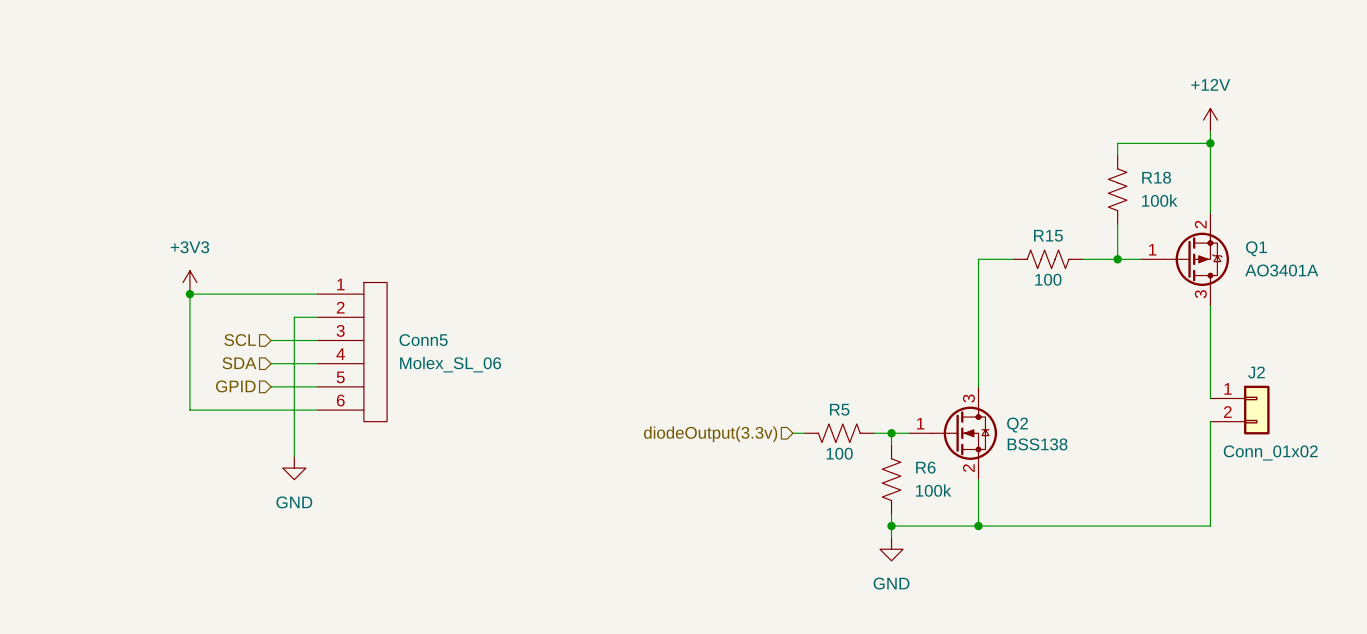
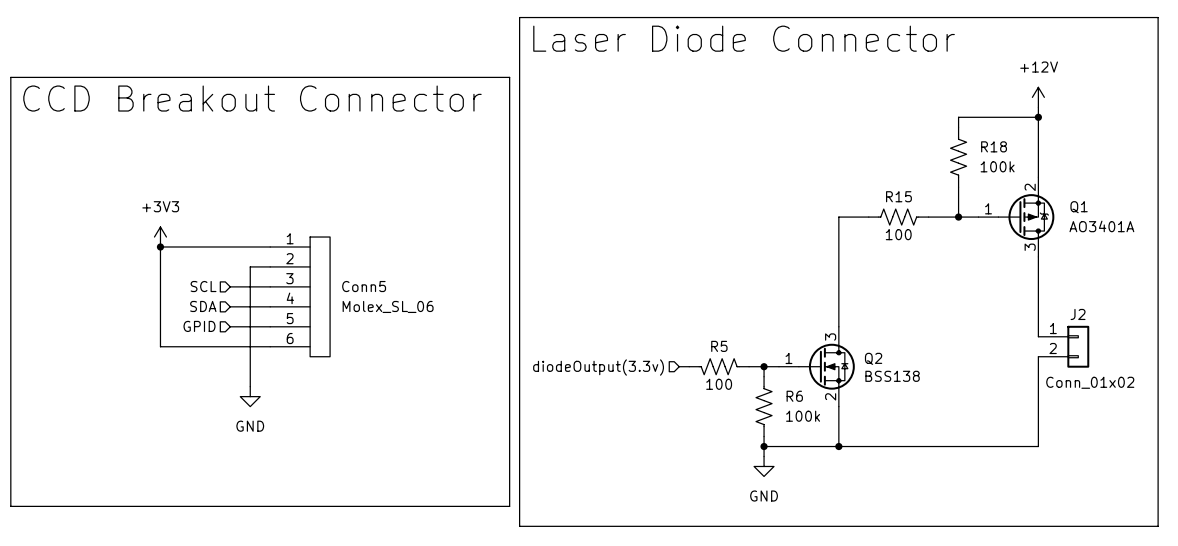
line: none -> (519, 17) (1158, 17) (1158, 526) (519, 526) (519, 17)
text: none -> Laser Diode Connector (744, 38)
line: none -> (10, 77) (509, 77) (509, 506) (10, 506) (10, 77)
text: none -> CCD Breakout Connector (252, 98)

